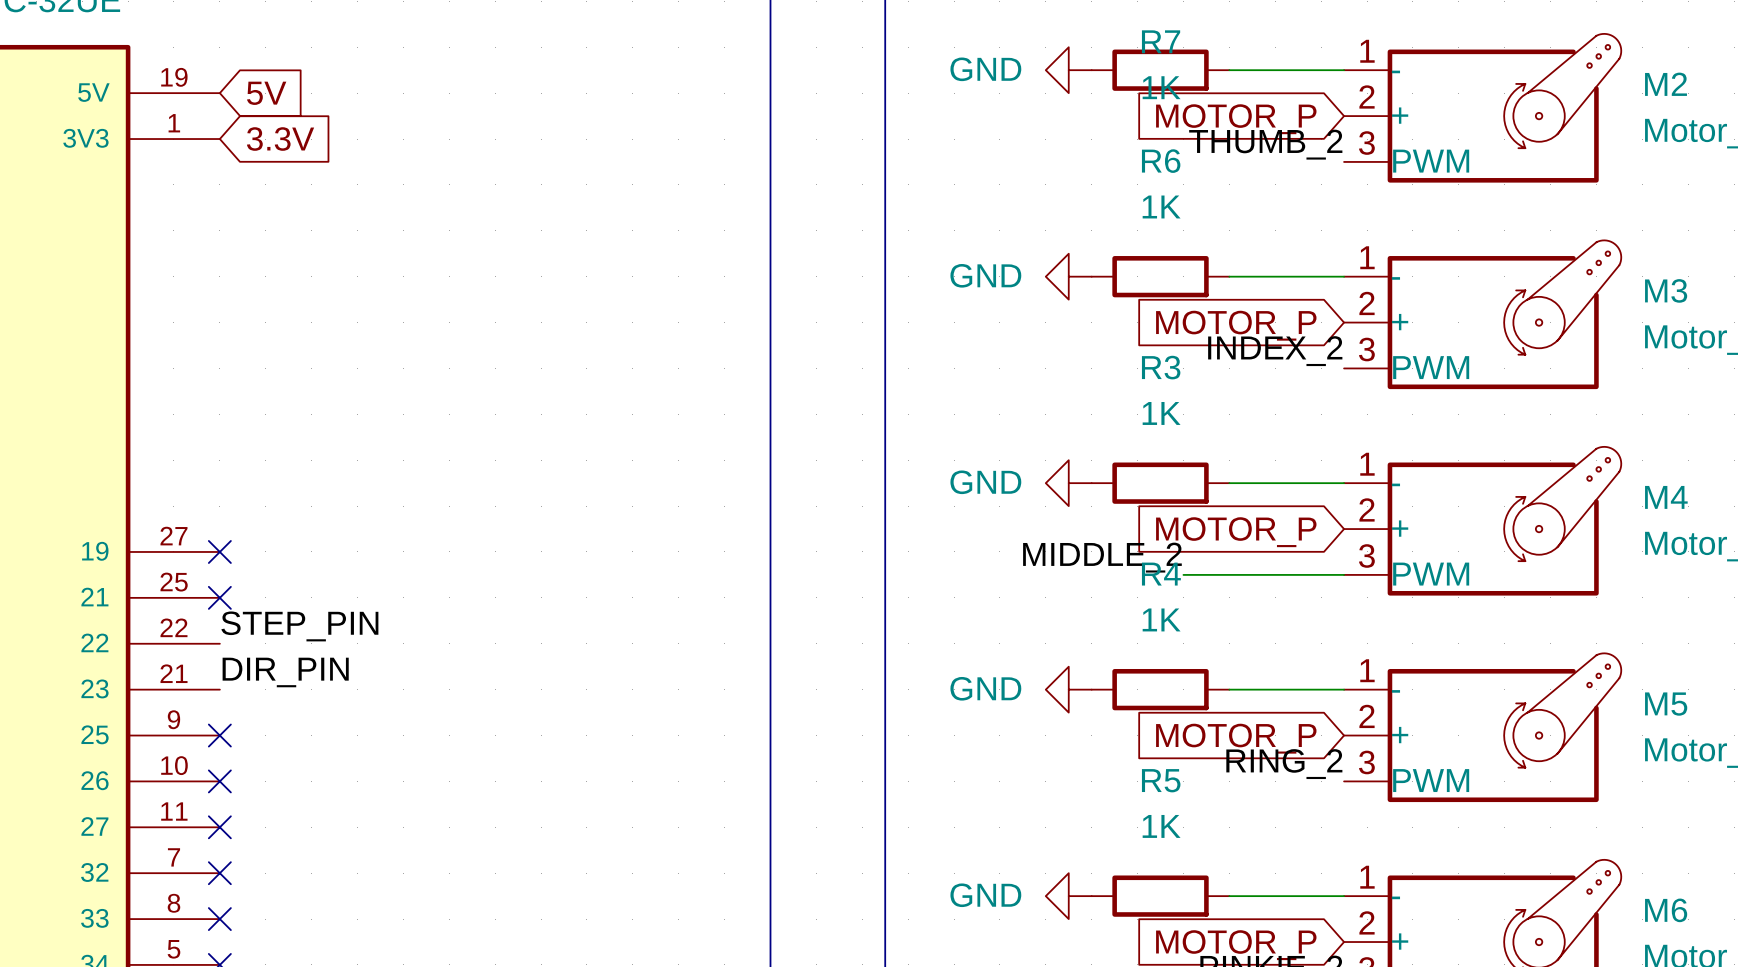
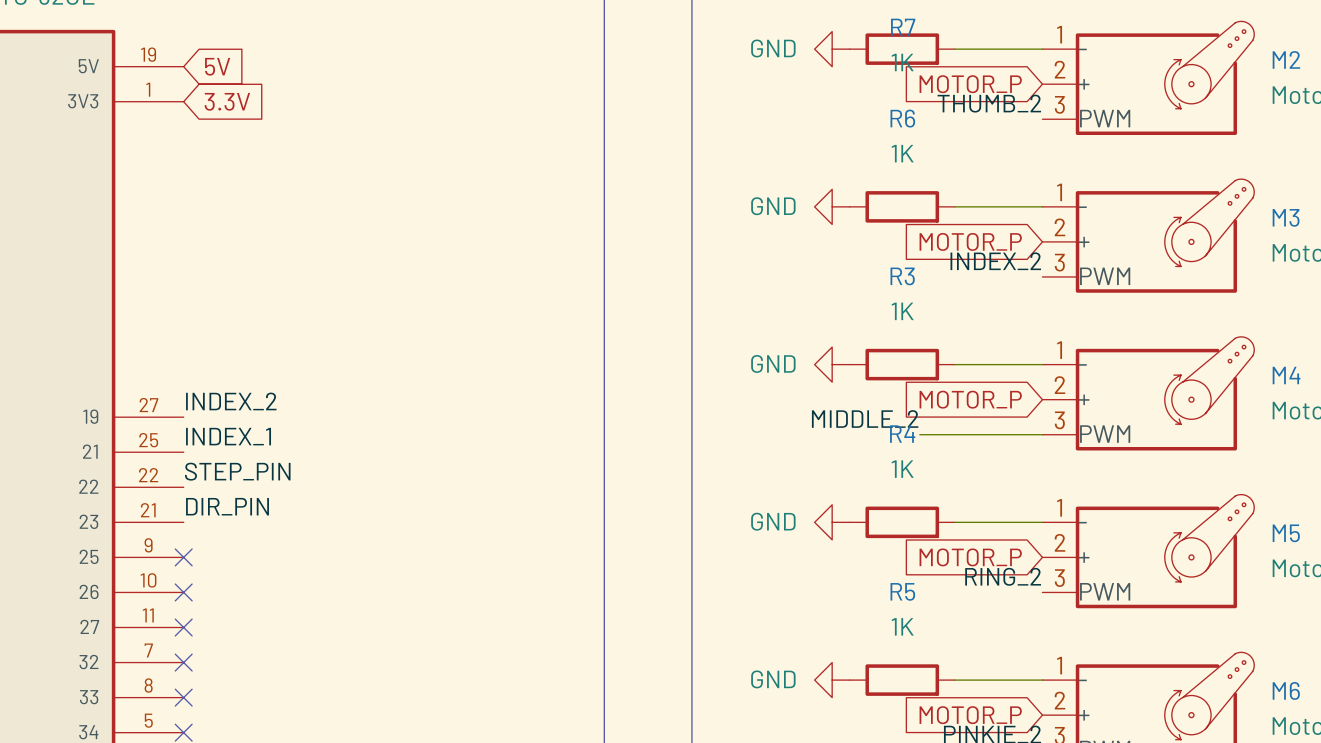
label: none -> INDEX_2 (231, 401)
no-connect mark: (219, 551) -> none
label: none -> INDEX_1 (228, 436)
no-connect mark: (219, 597) -> none

